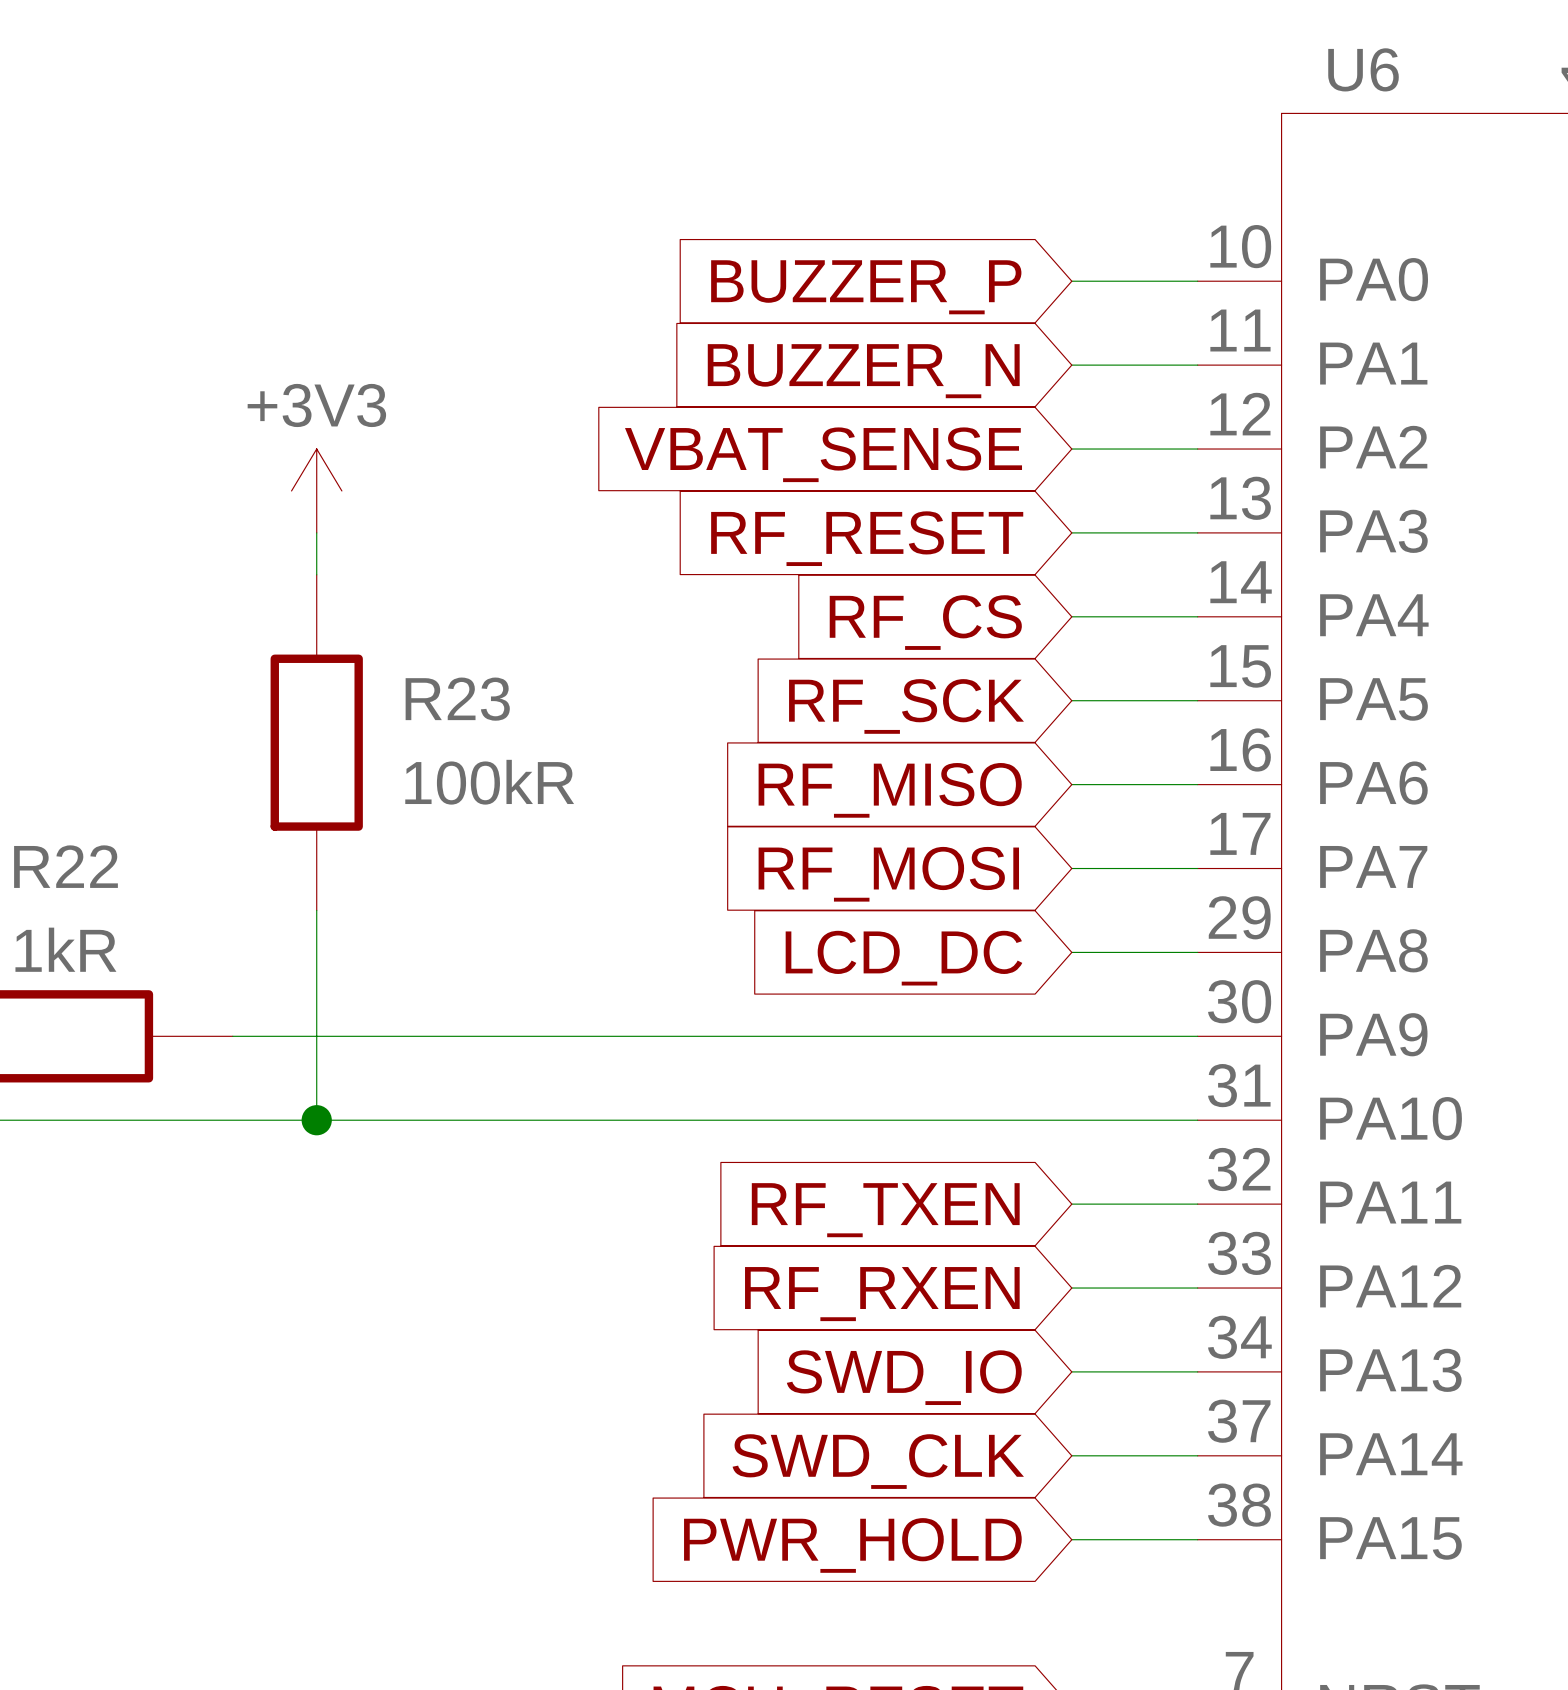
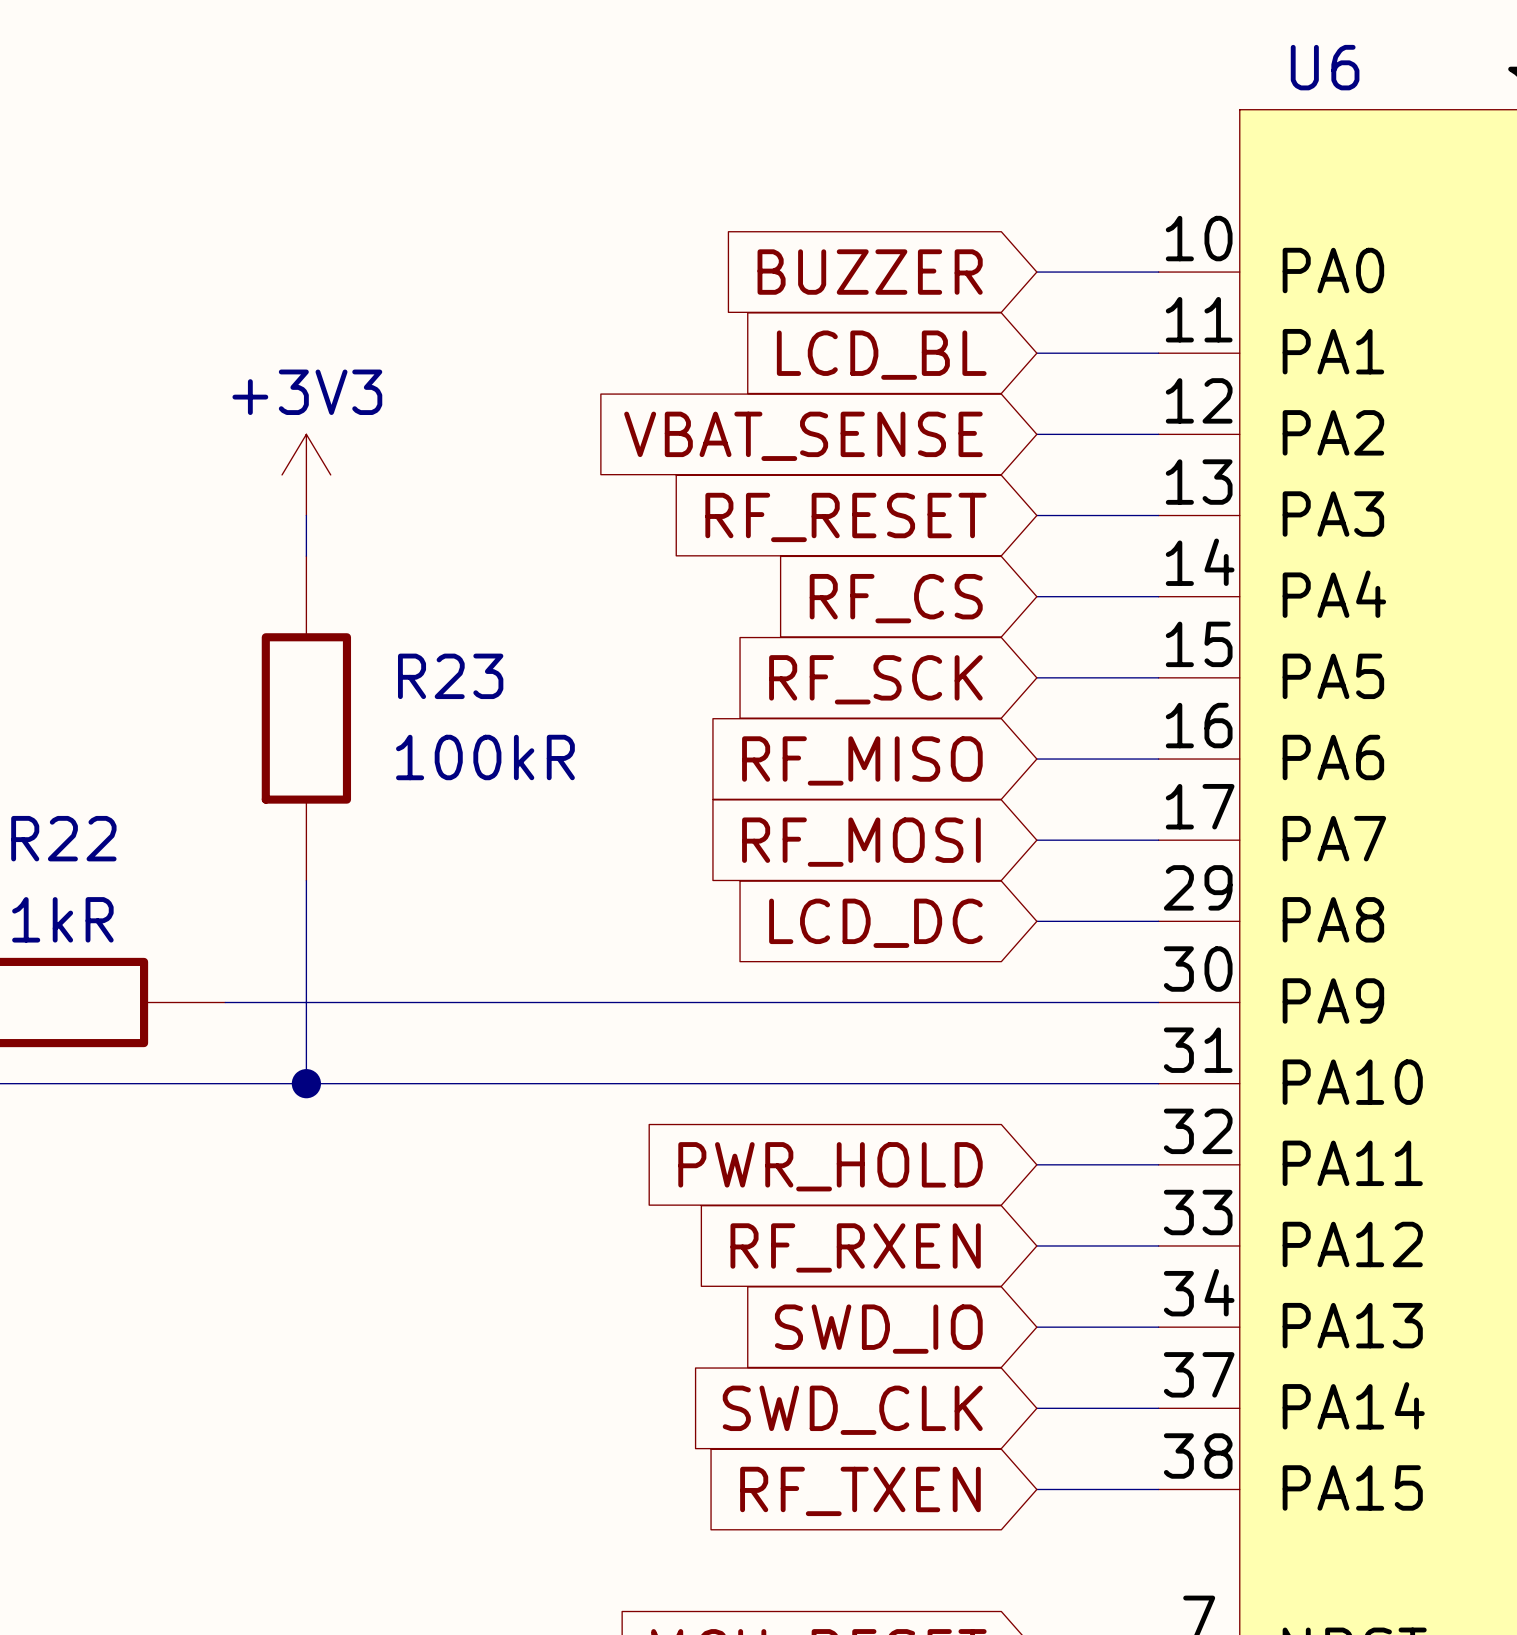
global label: BUZZER_P (866, 287) -> BUZZER (870, 272)
global label: BUZZER_N (863, 371) -> LCD_BL (881, 355)
global label: RF_TXEN (885, 1210) -> PWR_HOLD (830, 1166)
global label: PWR_HOLD (852, 1545) -> RF_TXEN (860, 1491)

